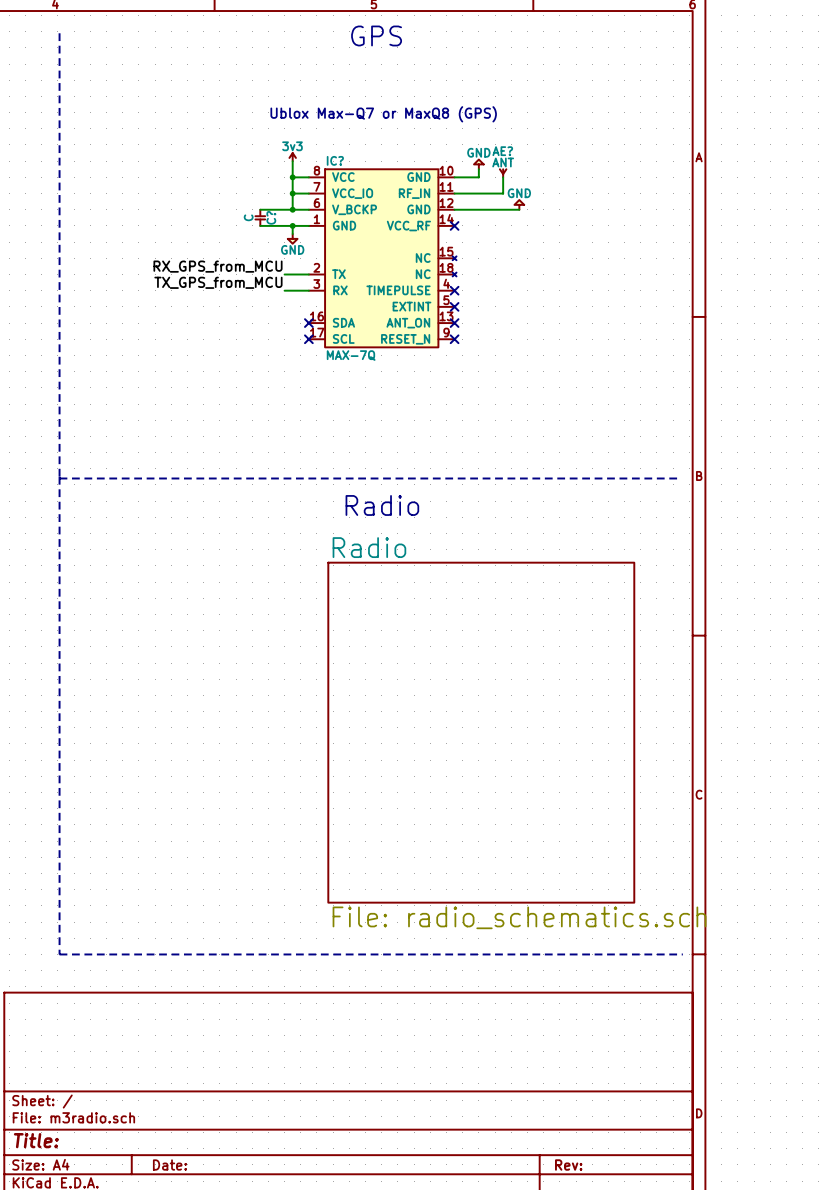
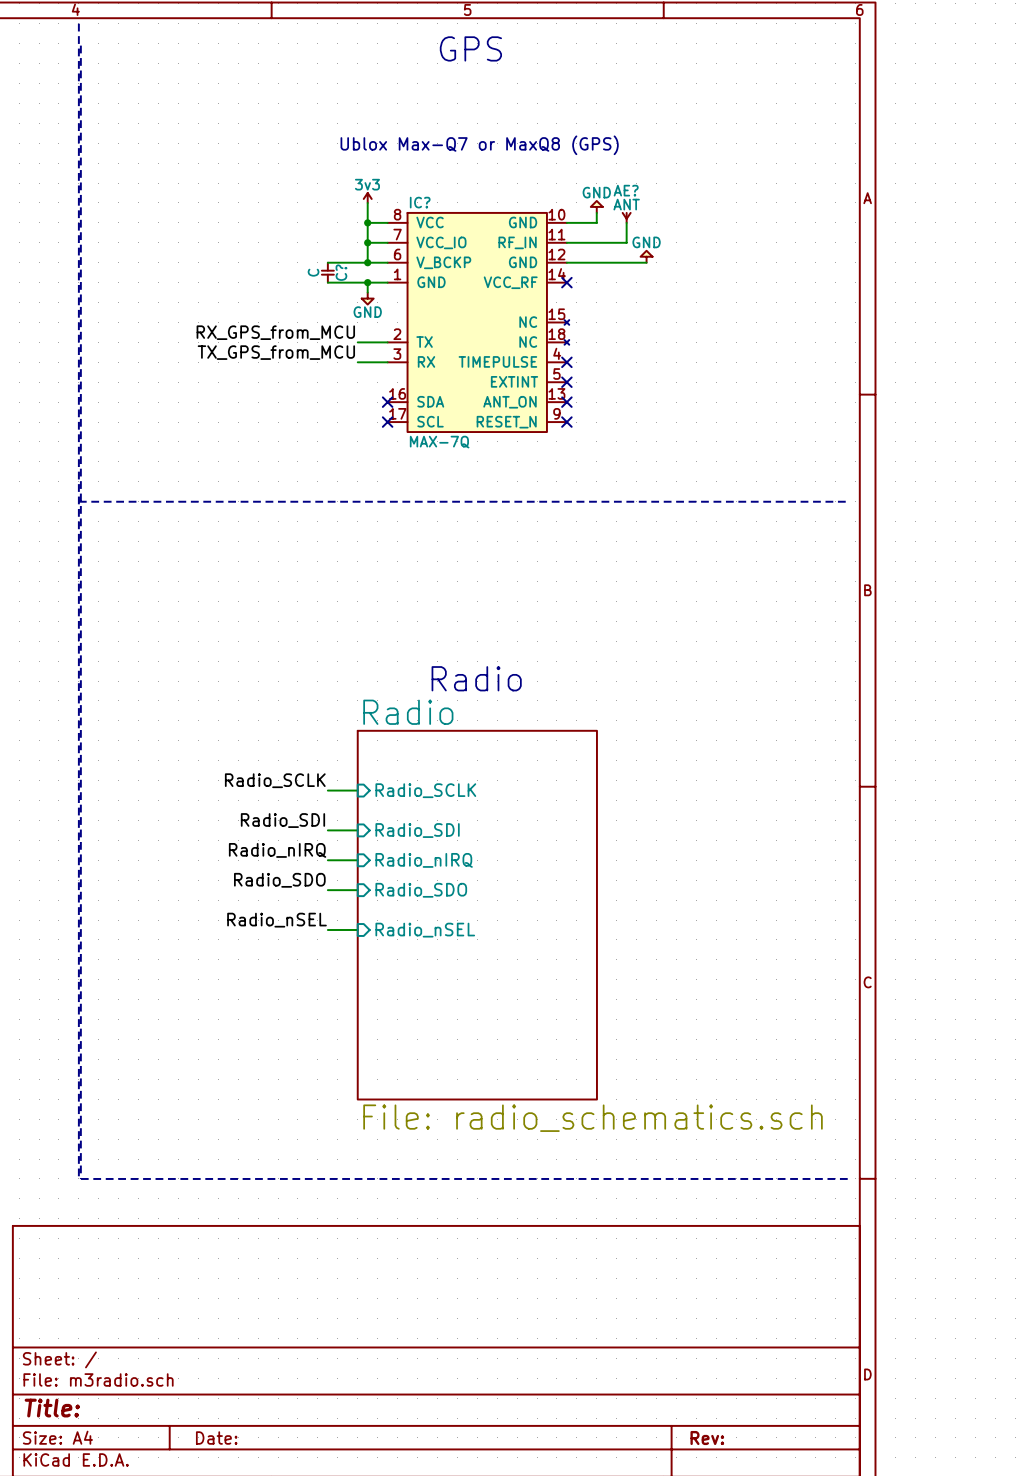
line: none -> (78, 23) (78, 1178)
line: none -> (78, 501) (845, 501)
line: (59, 478) (679, 478) -> none
text position: Radio (382, 505) -> Radio (476, 678)
label: none -> Radio_SCLK (275, 780)
wire: none -> (327, 790) (357, 790)
sheet pin: none -> Radio_SCLK (425, 790)
label: none -> Radio_SDI (282, 820)
wire: none -> (327, 830) (357, 830)
sheet pin: none -> Radio_SDI (417, 830)
label: none -> Radio_nIRQ (277, 850)
wire: none -> (327, 860) (357, 860)
sheet pin: none -> Radio_nIRQ (424, 860)
label: none -> Radio_SDO (279, 880)
wire: none -> (327, 890) (357, 890)
sheet pin: none -> Radio_SDO (421, 890)
sheet Radio: File: radio_schematics.sch (481, 732) -> none
sheet Radio: none -> File: radio_schematics.sch (477, 915)
label: none -> Radio_nSEL (277, 920)
wire: none -> (327, 929) (357, 929)
sheet pin: none -> Radio_nSEL (425, 930)

